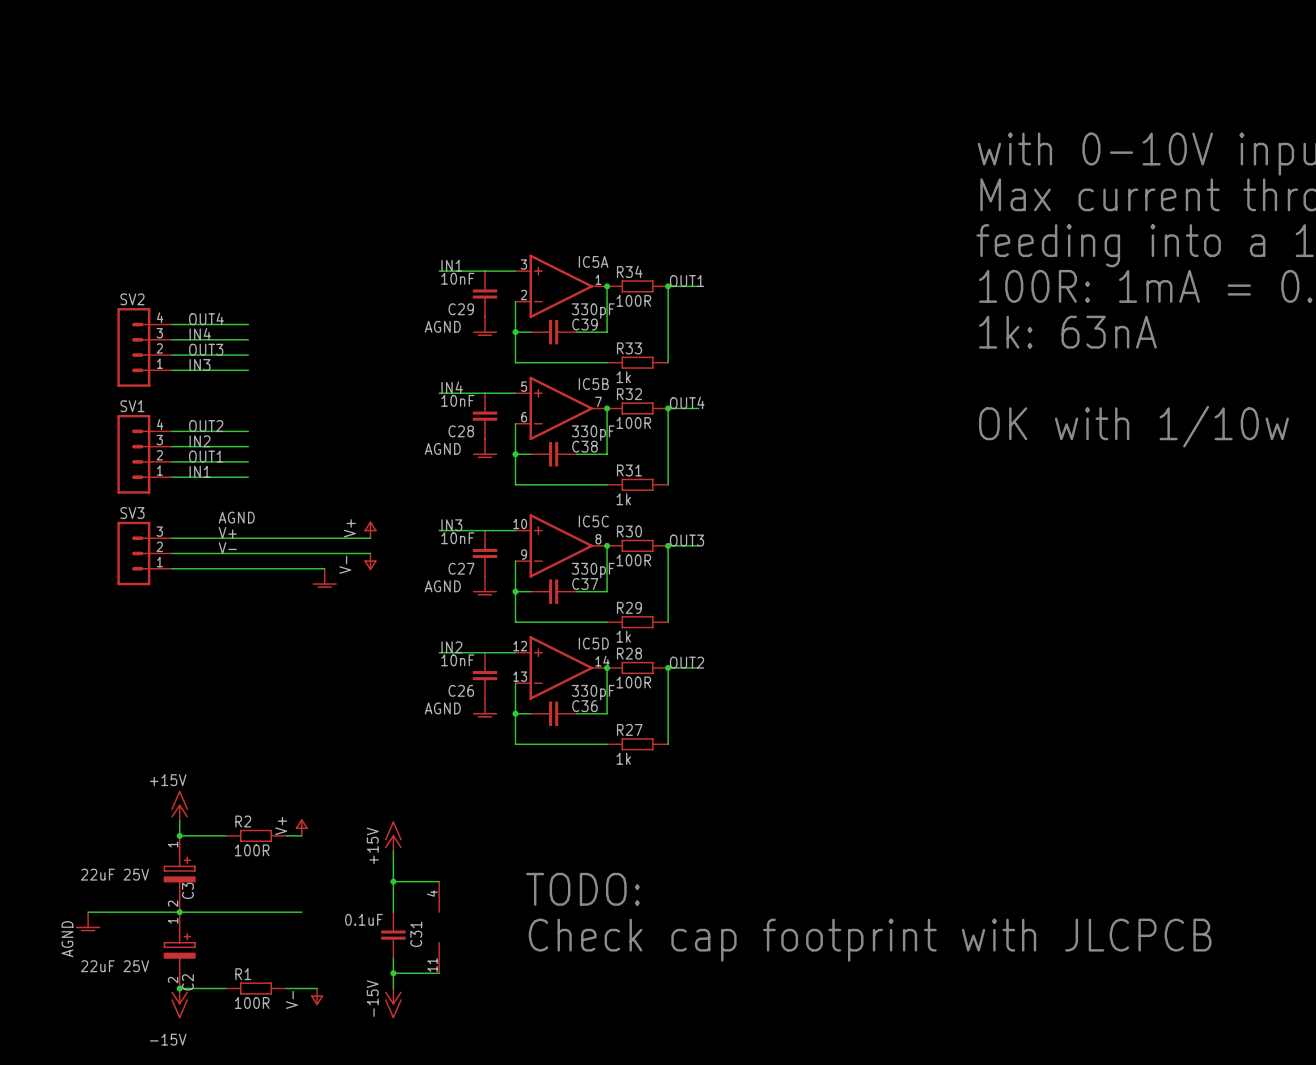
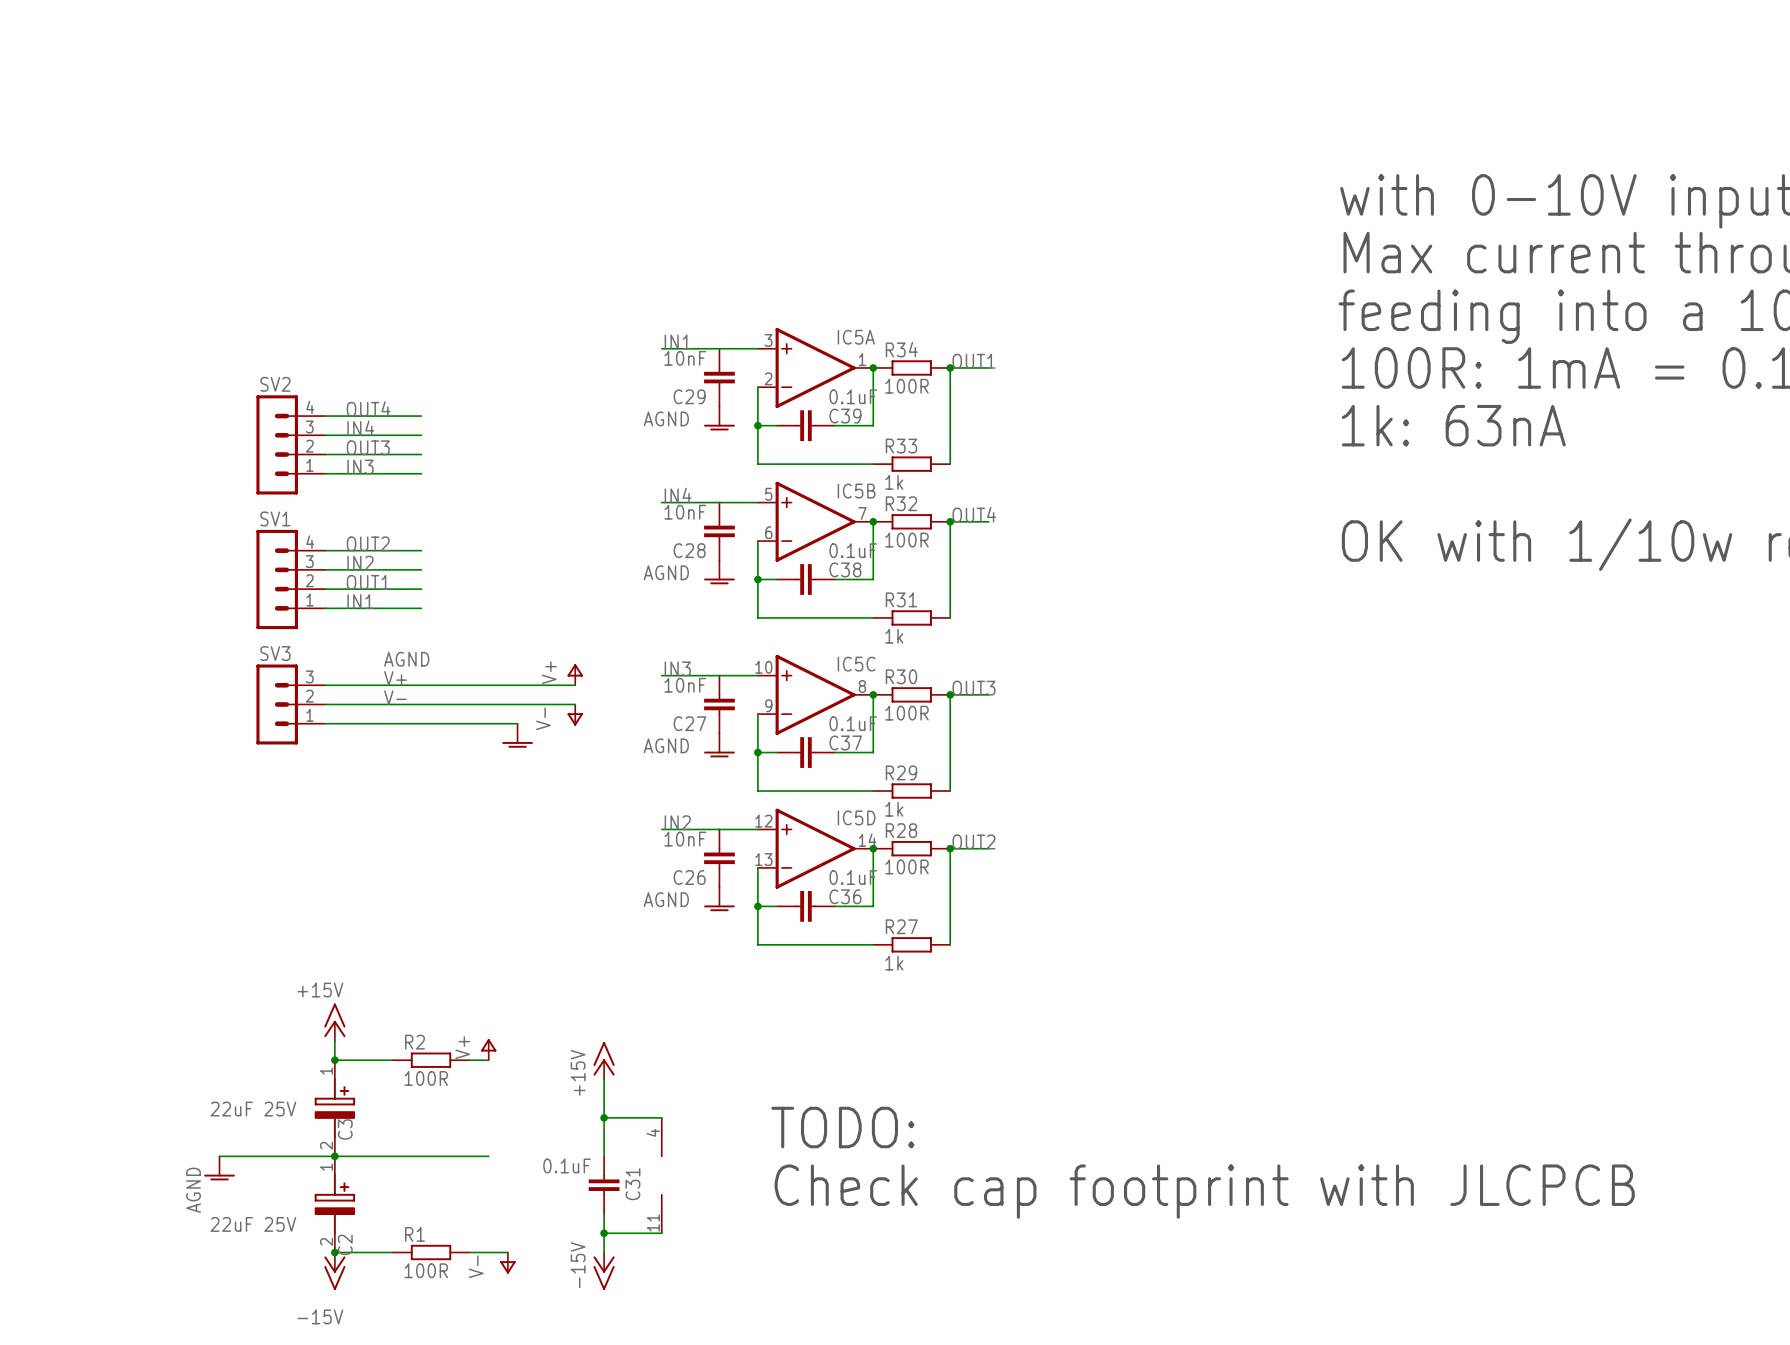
C39 value: 330pF (593, 311) -> 0.1uF (853, 396)
C38 value: 330pF (593, 433) -> 0.1uF (853, 550)
C37 value: 330pF (593, 570) -> 0.1uF (853, 723)
C36 value: 330pF (593, 692) -> 0.1uF (853, 877)

